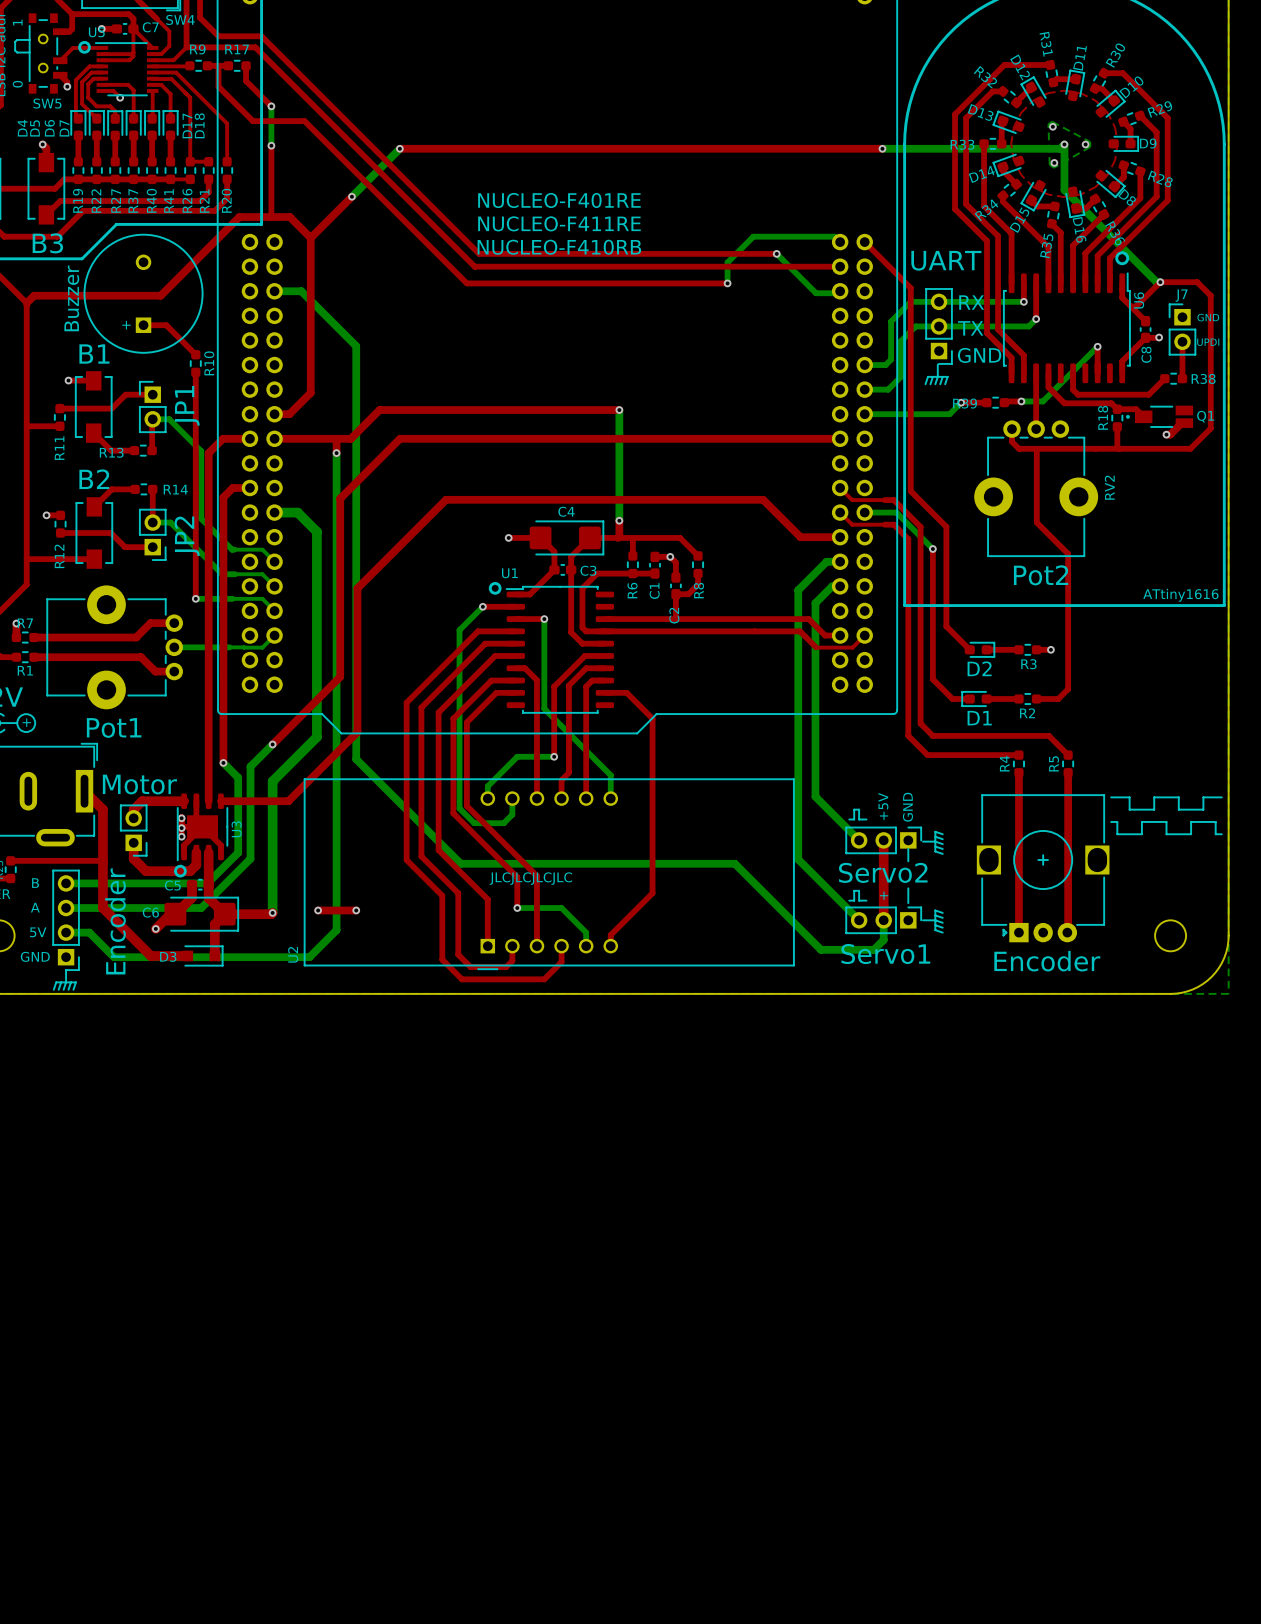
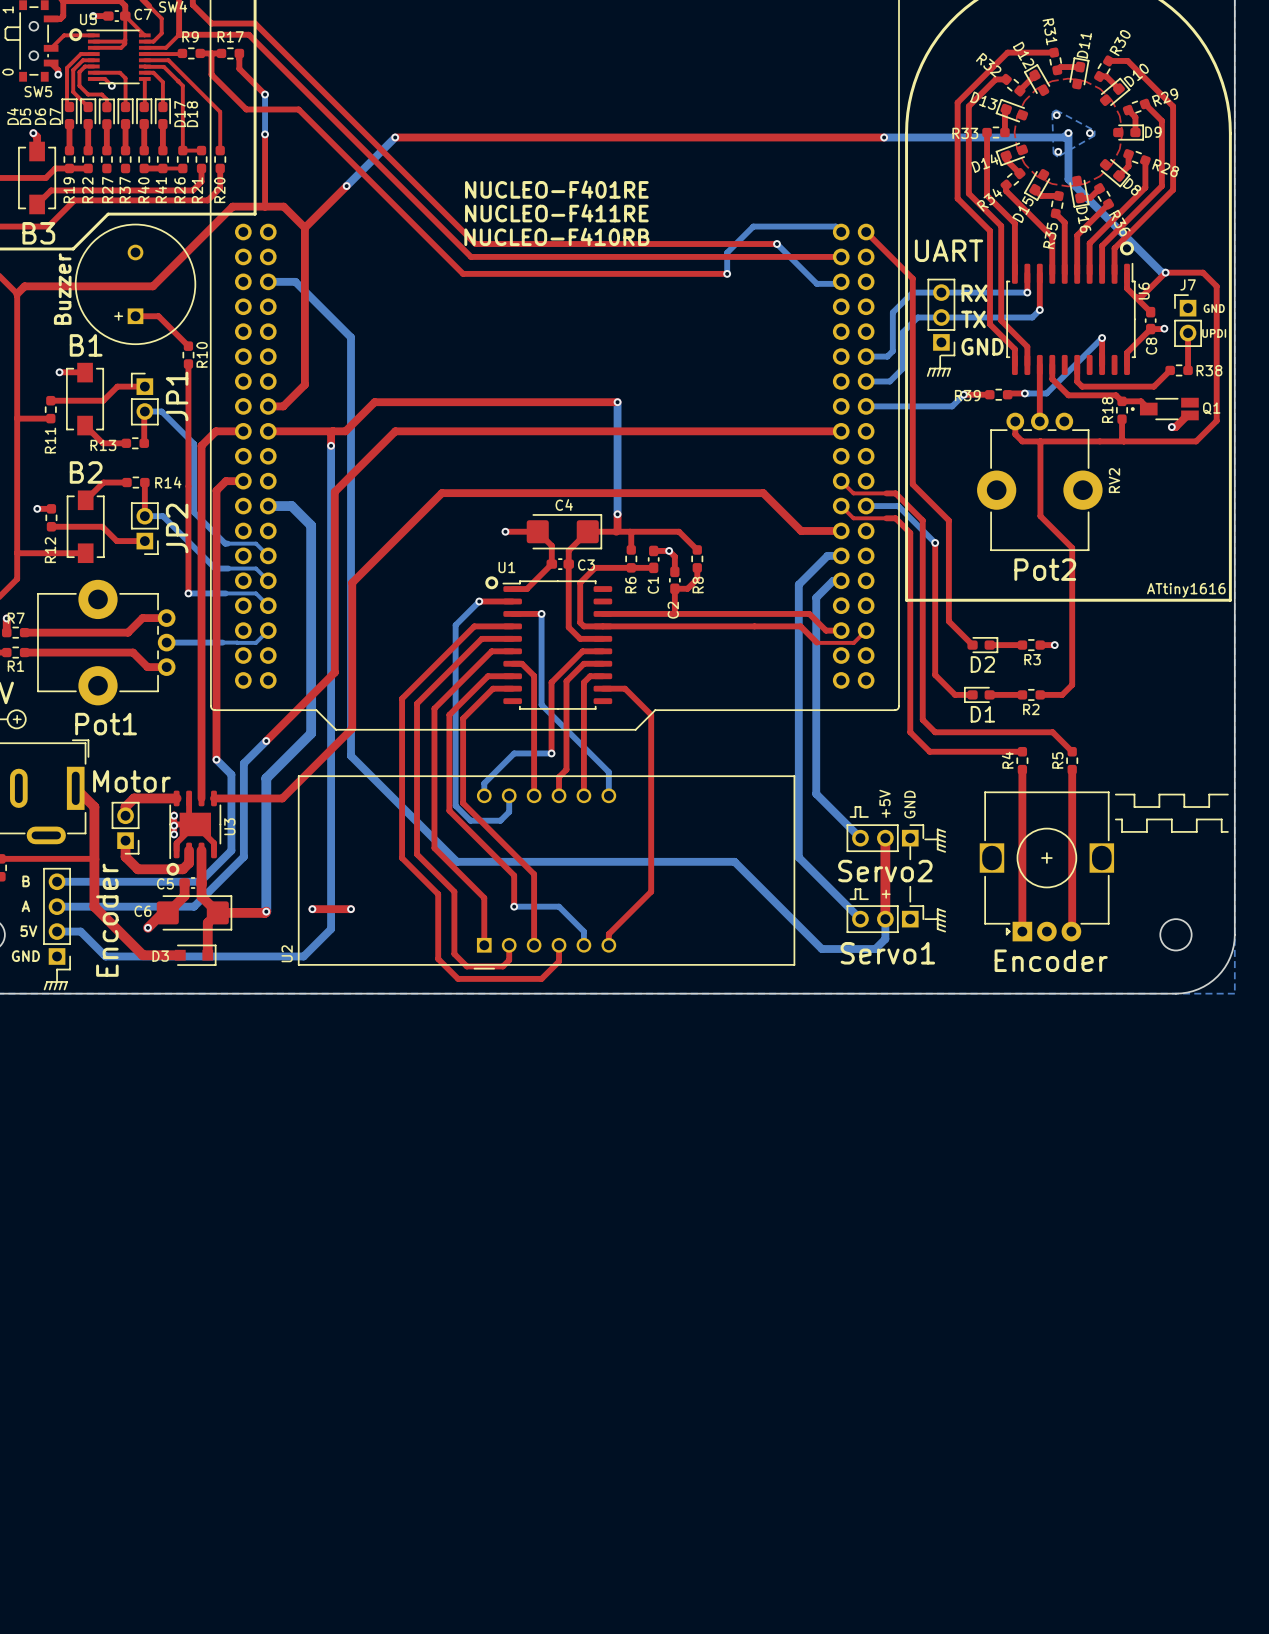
top track: (96, 179) (152, 179) -> none
text: JLCJLCJLCJLC (530, 878) -> none

